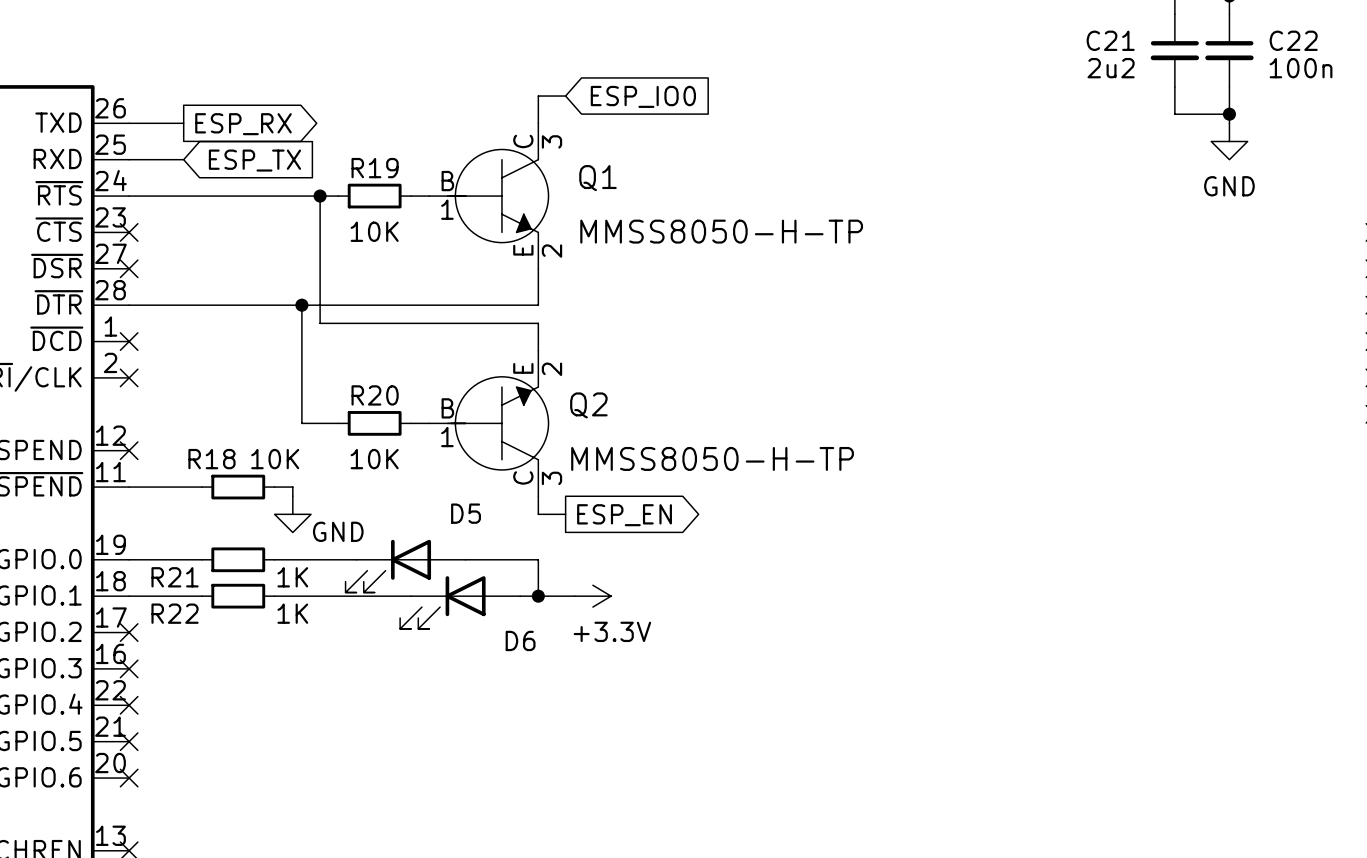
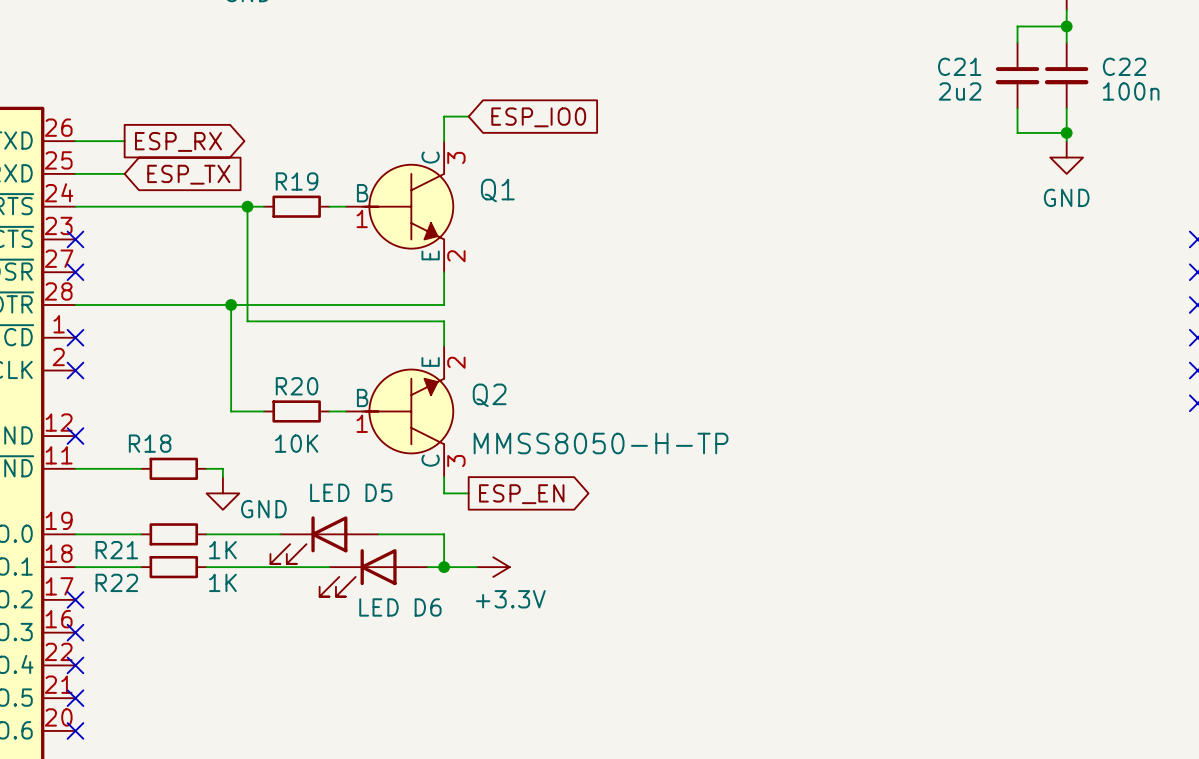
R19 value: 10K (374, 231) -> none
Q1 value: MMSS8050-H-TP (721, 231) -> none
R18 value: 10K (275, 459) -> none
D5 value: none -> LED (329, 492)
D6 value: none -> LED (378, 607)

